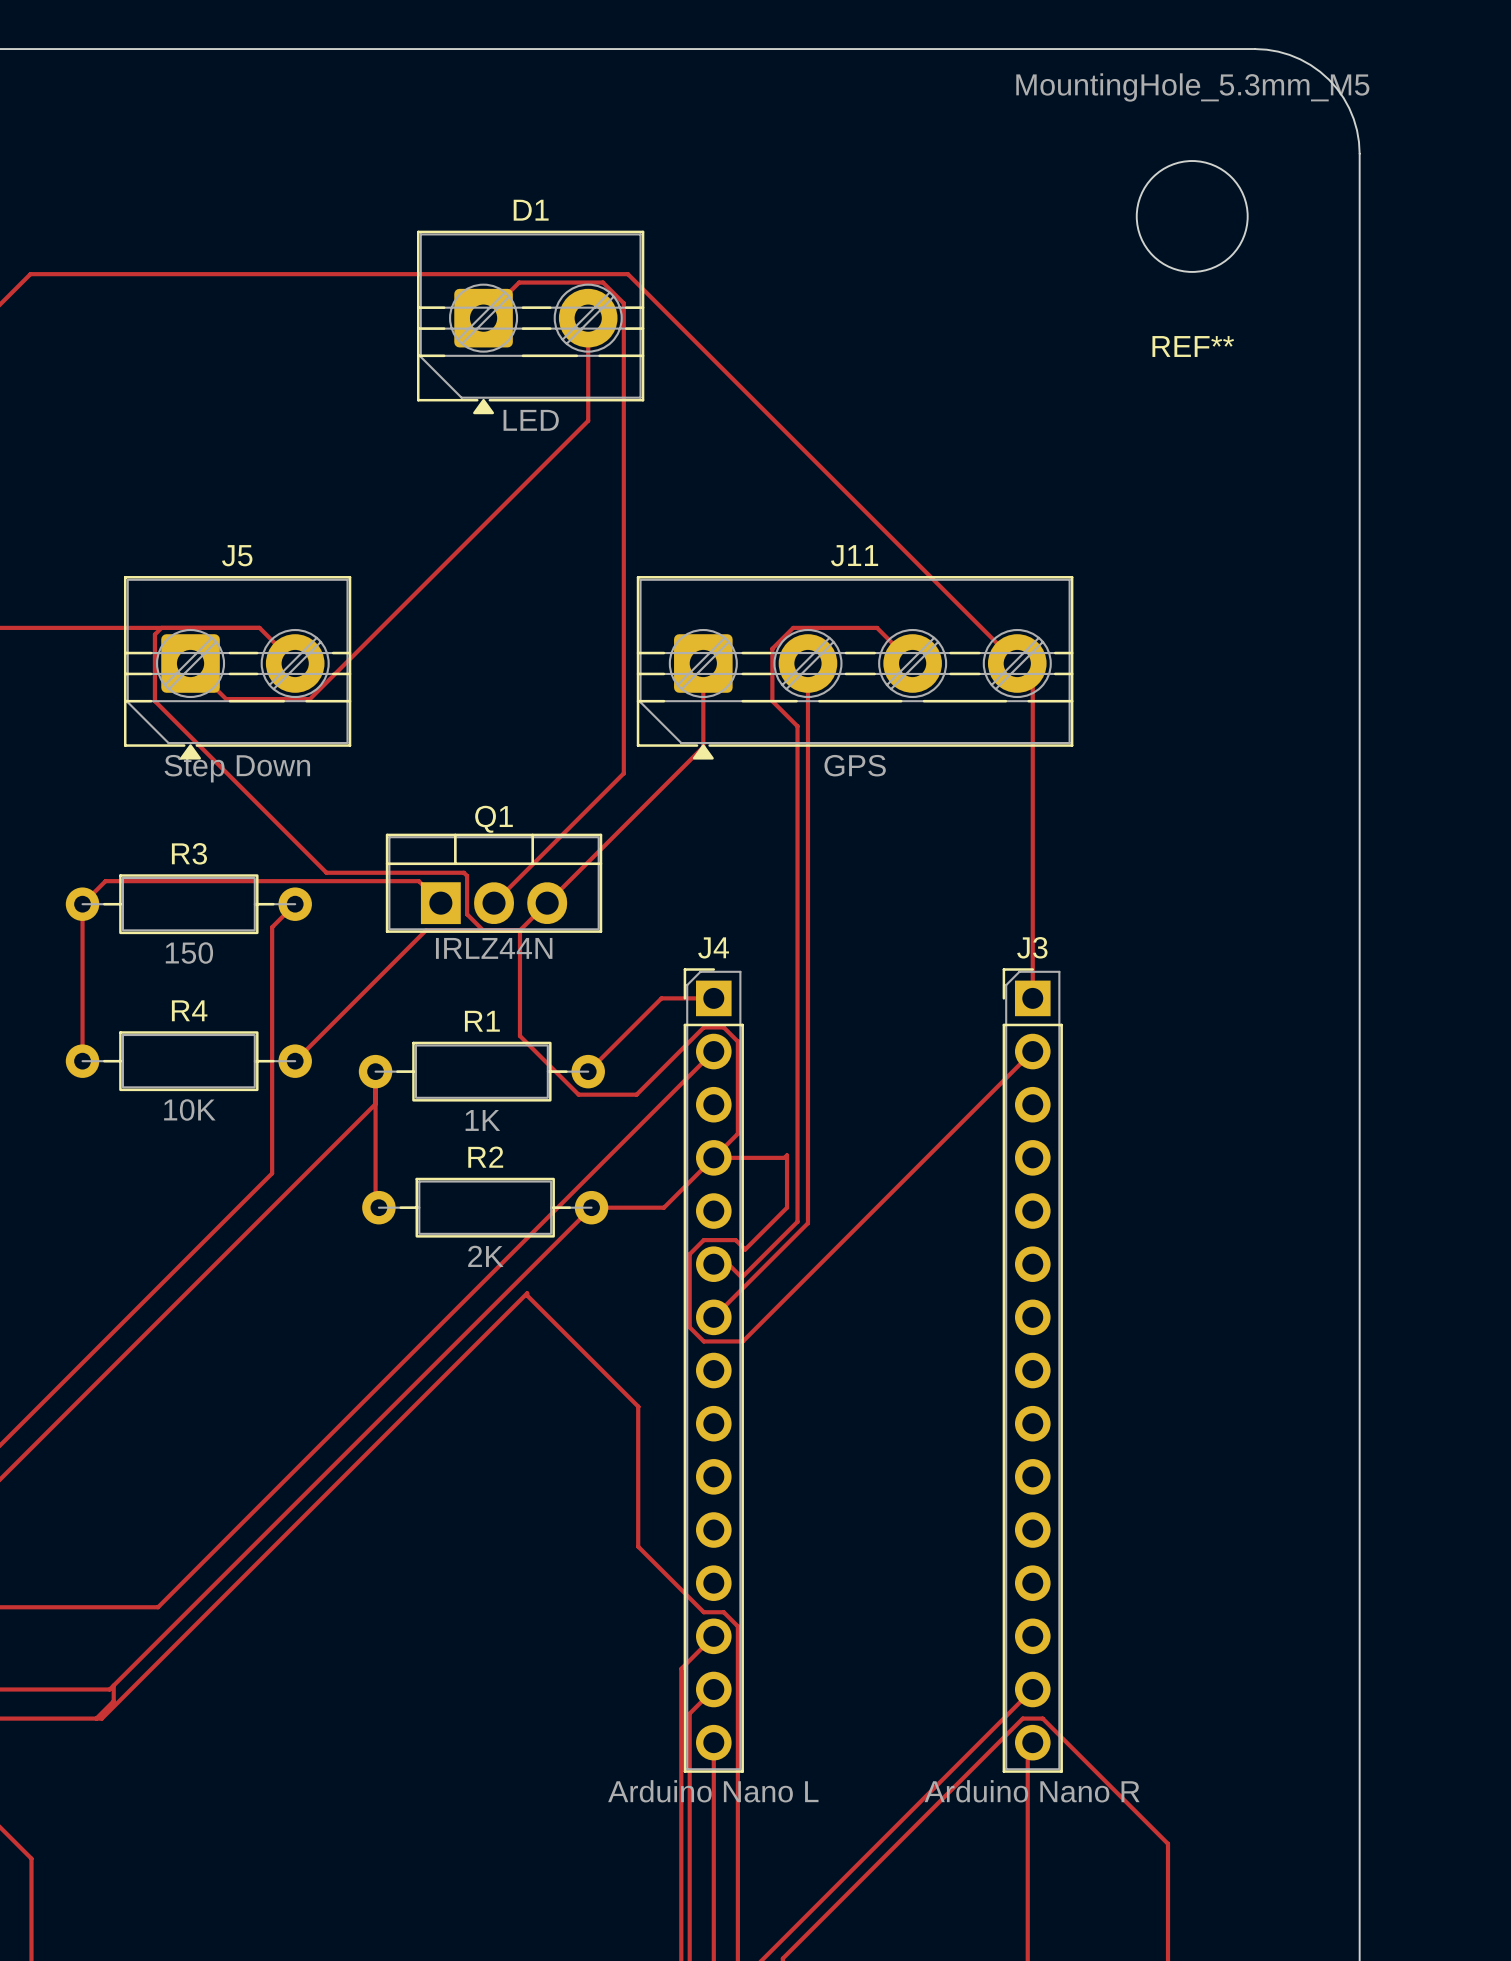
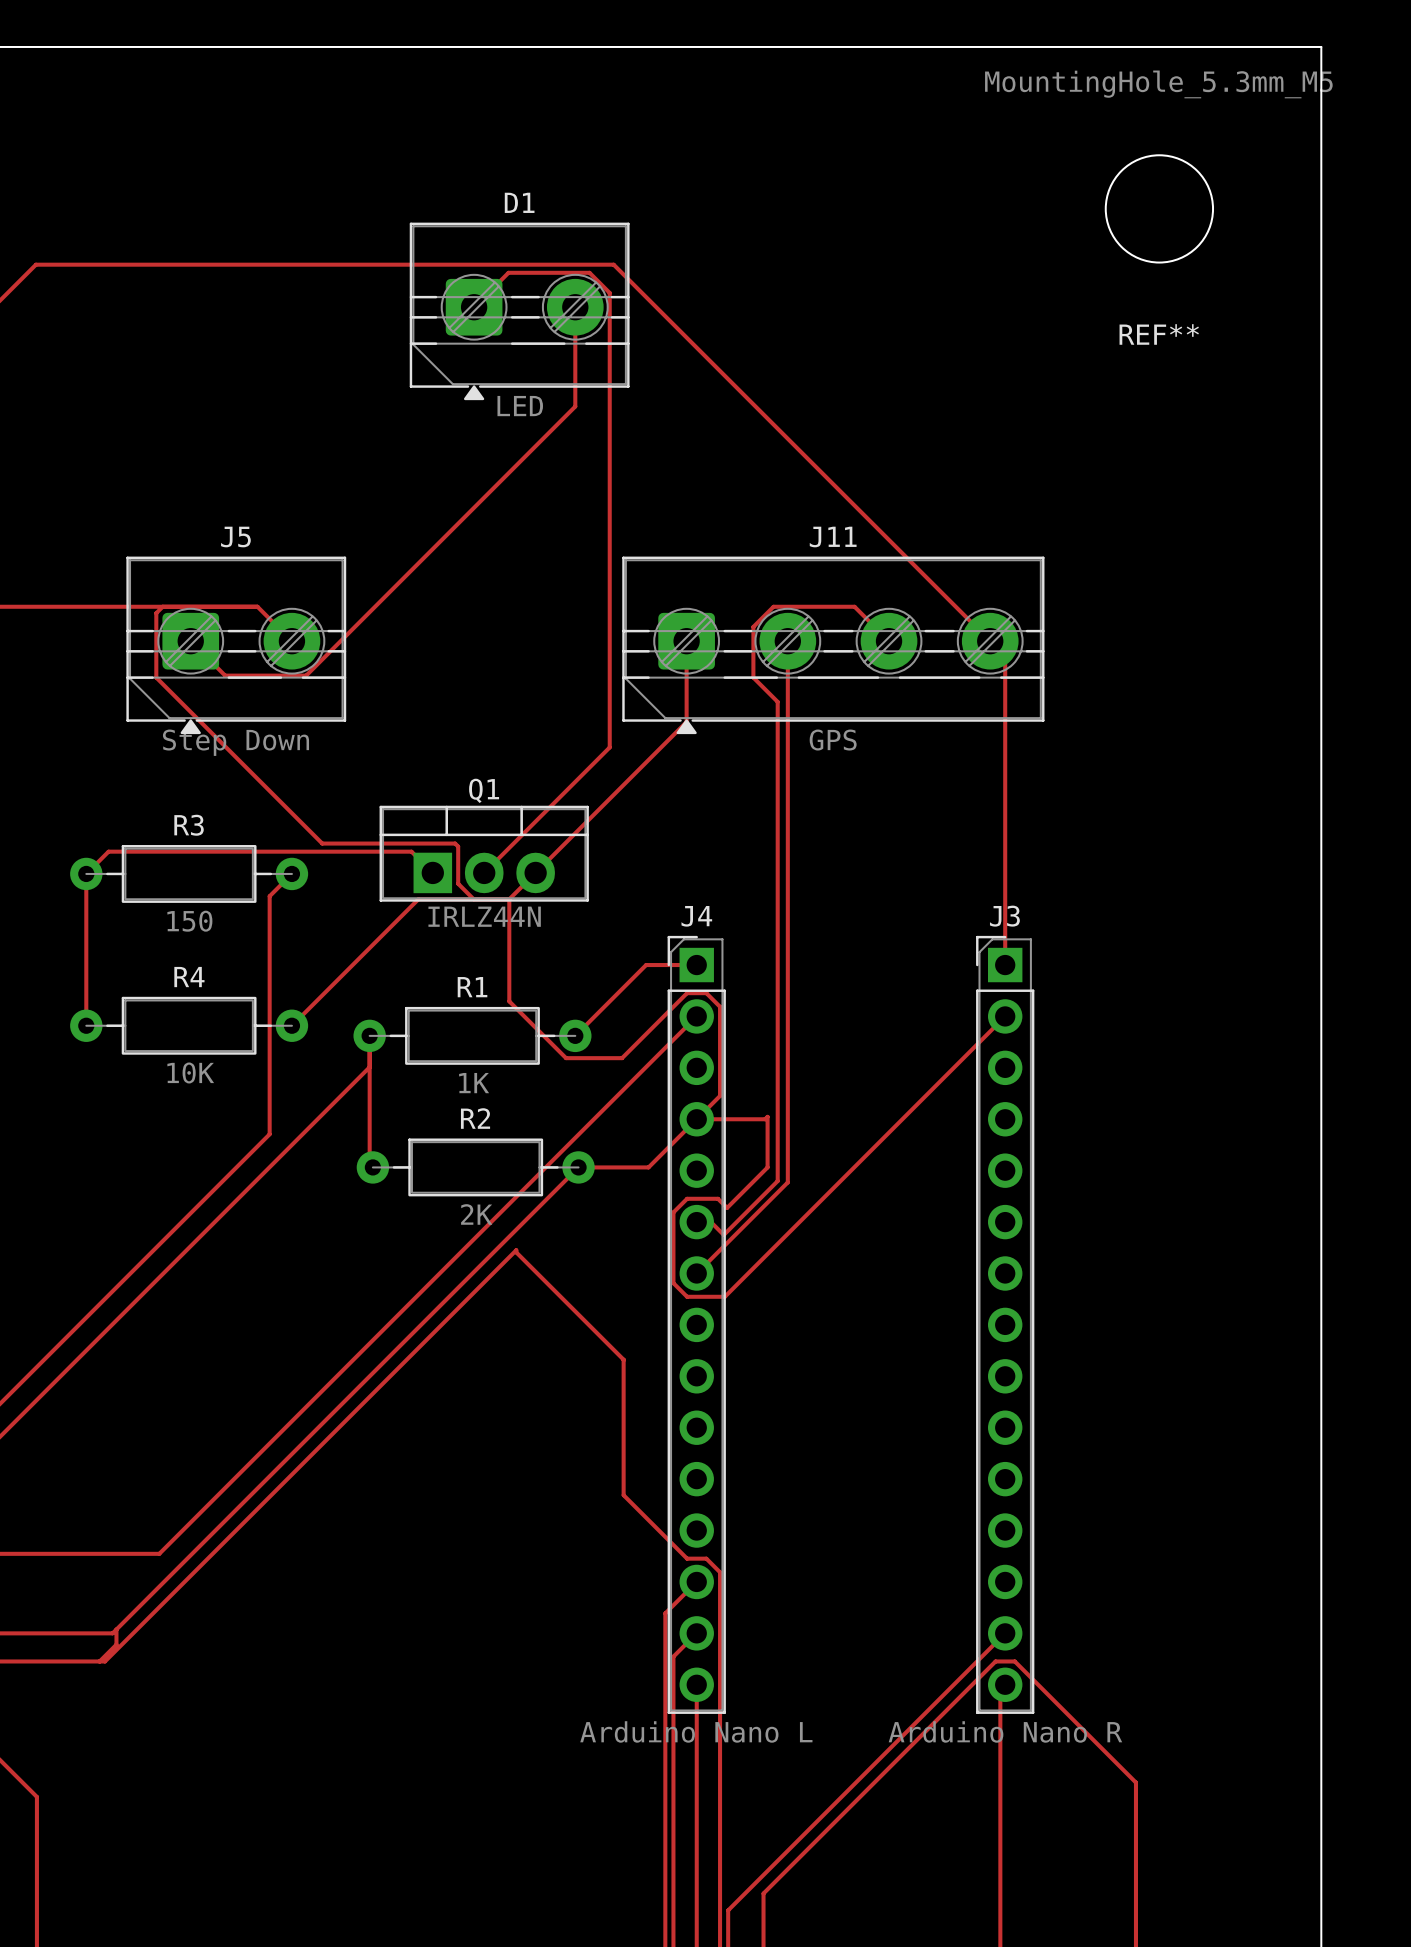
board edge: (1255, 49) (1289, 54) (1310, 65) (1329, 79) (1349, 108) (1357, 130) (1359, 153) -> (1220, 46) (1321, 46) (1321, 148)

